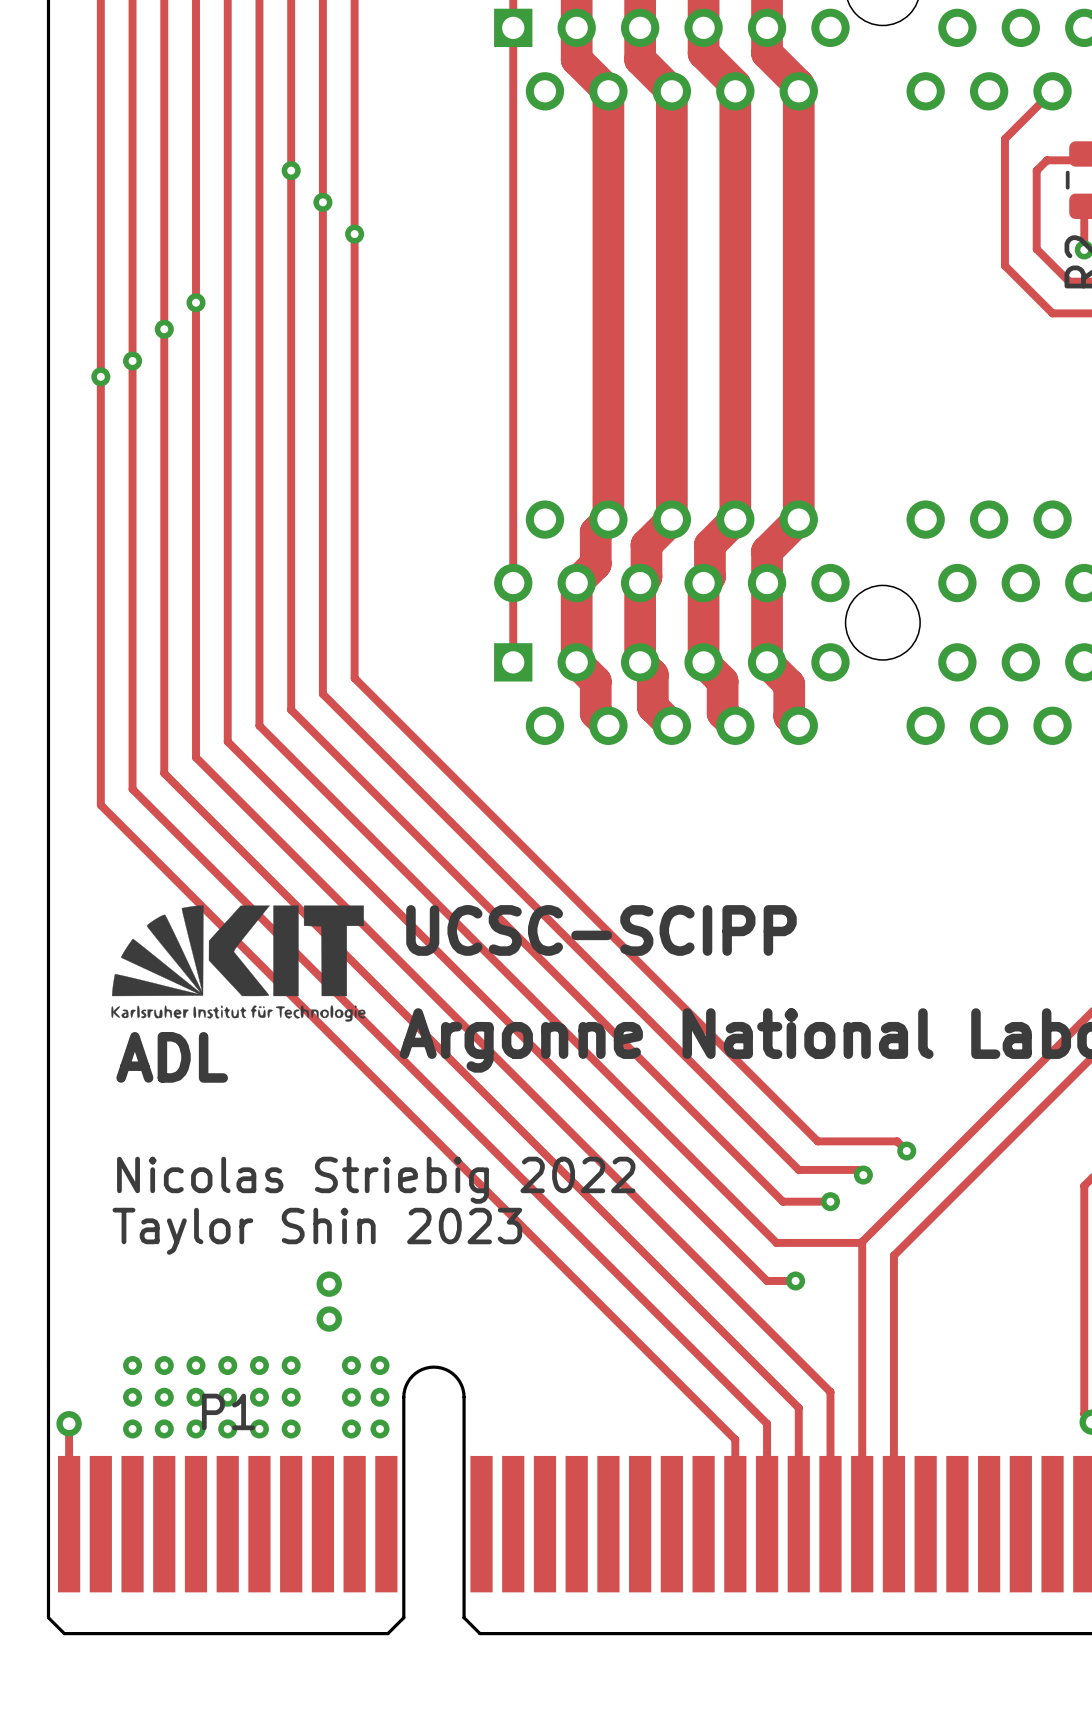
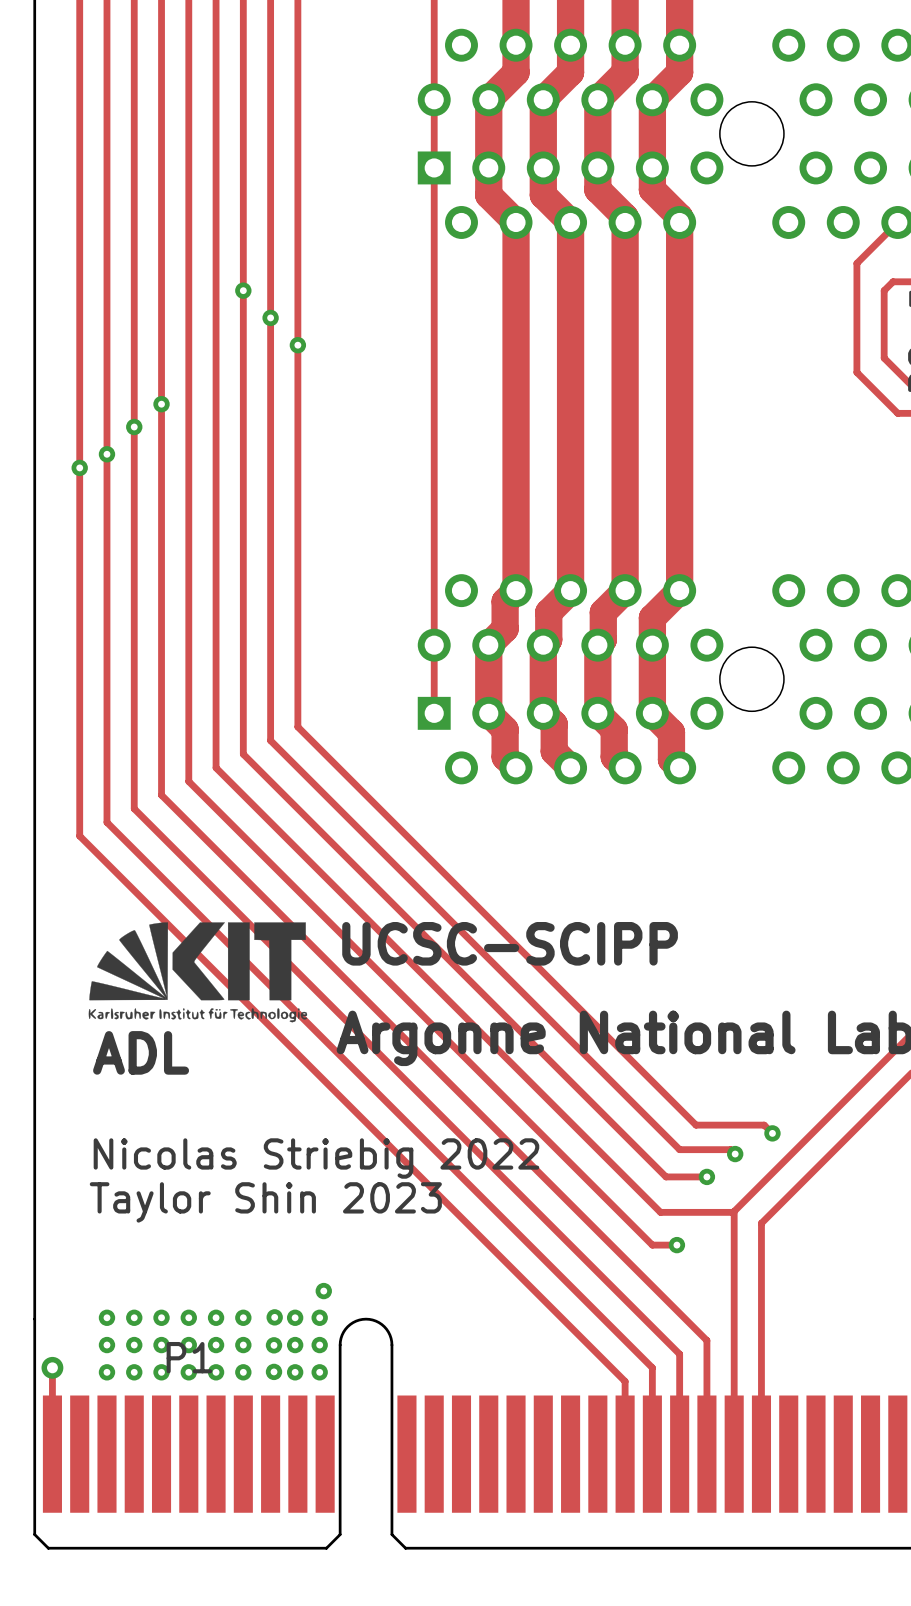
via: (329, 1284) -> none
via: (329, 1319) -> none
via: none -> (323, 1291)
via: none -> (274, 1317)
via: none -> (274, 1345)
via: none -> (274, 1371)

